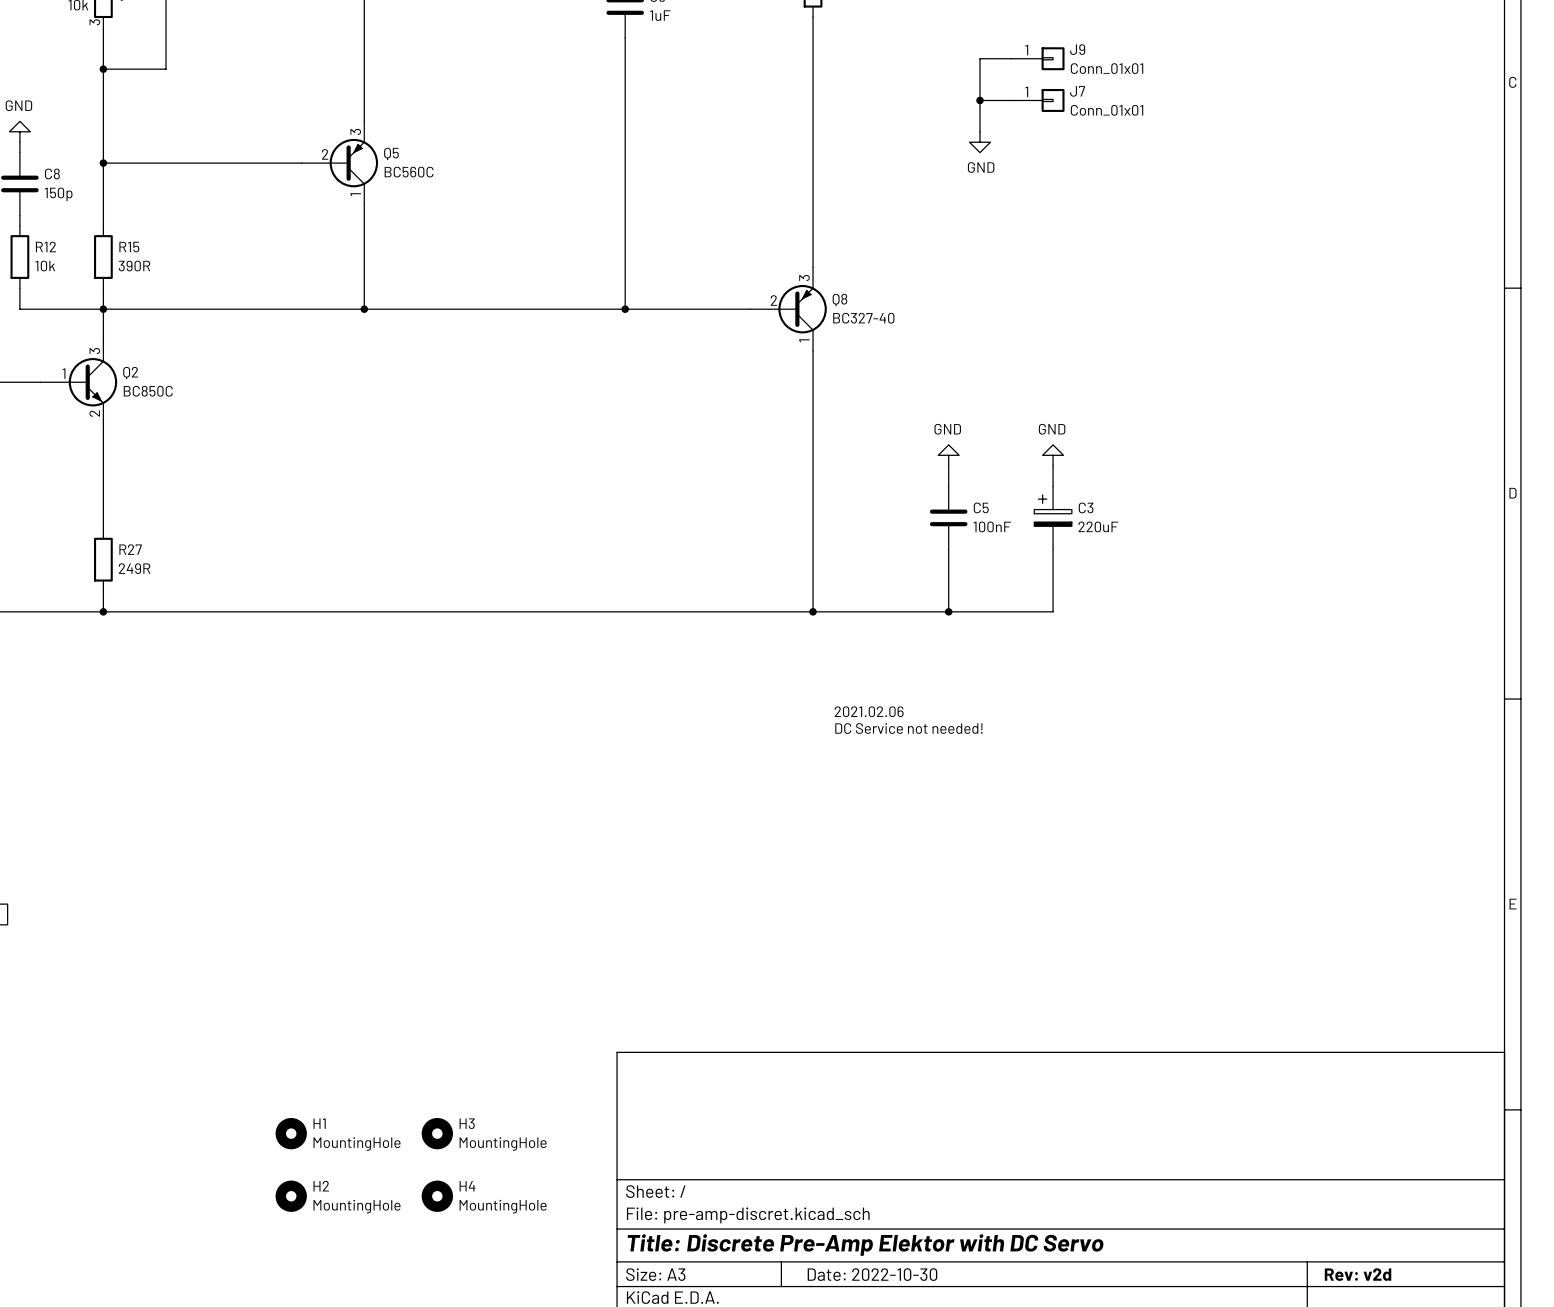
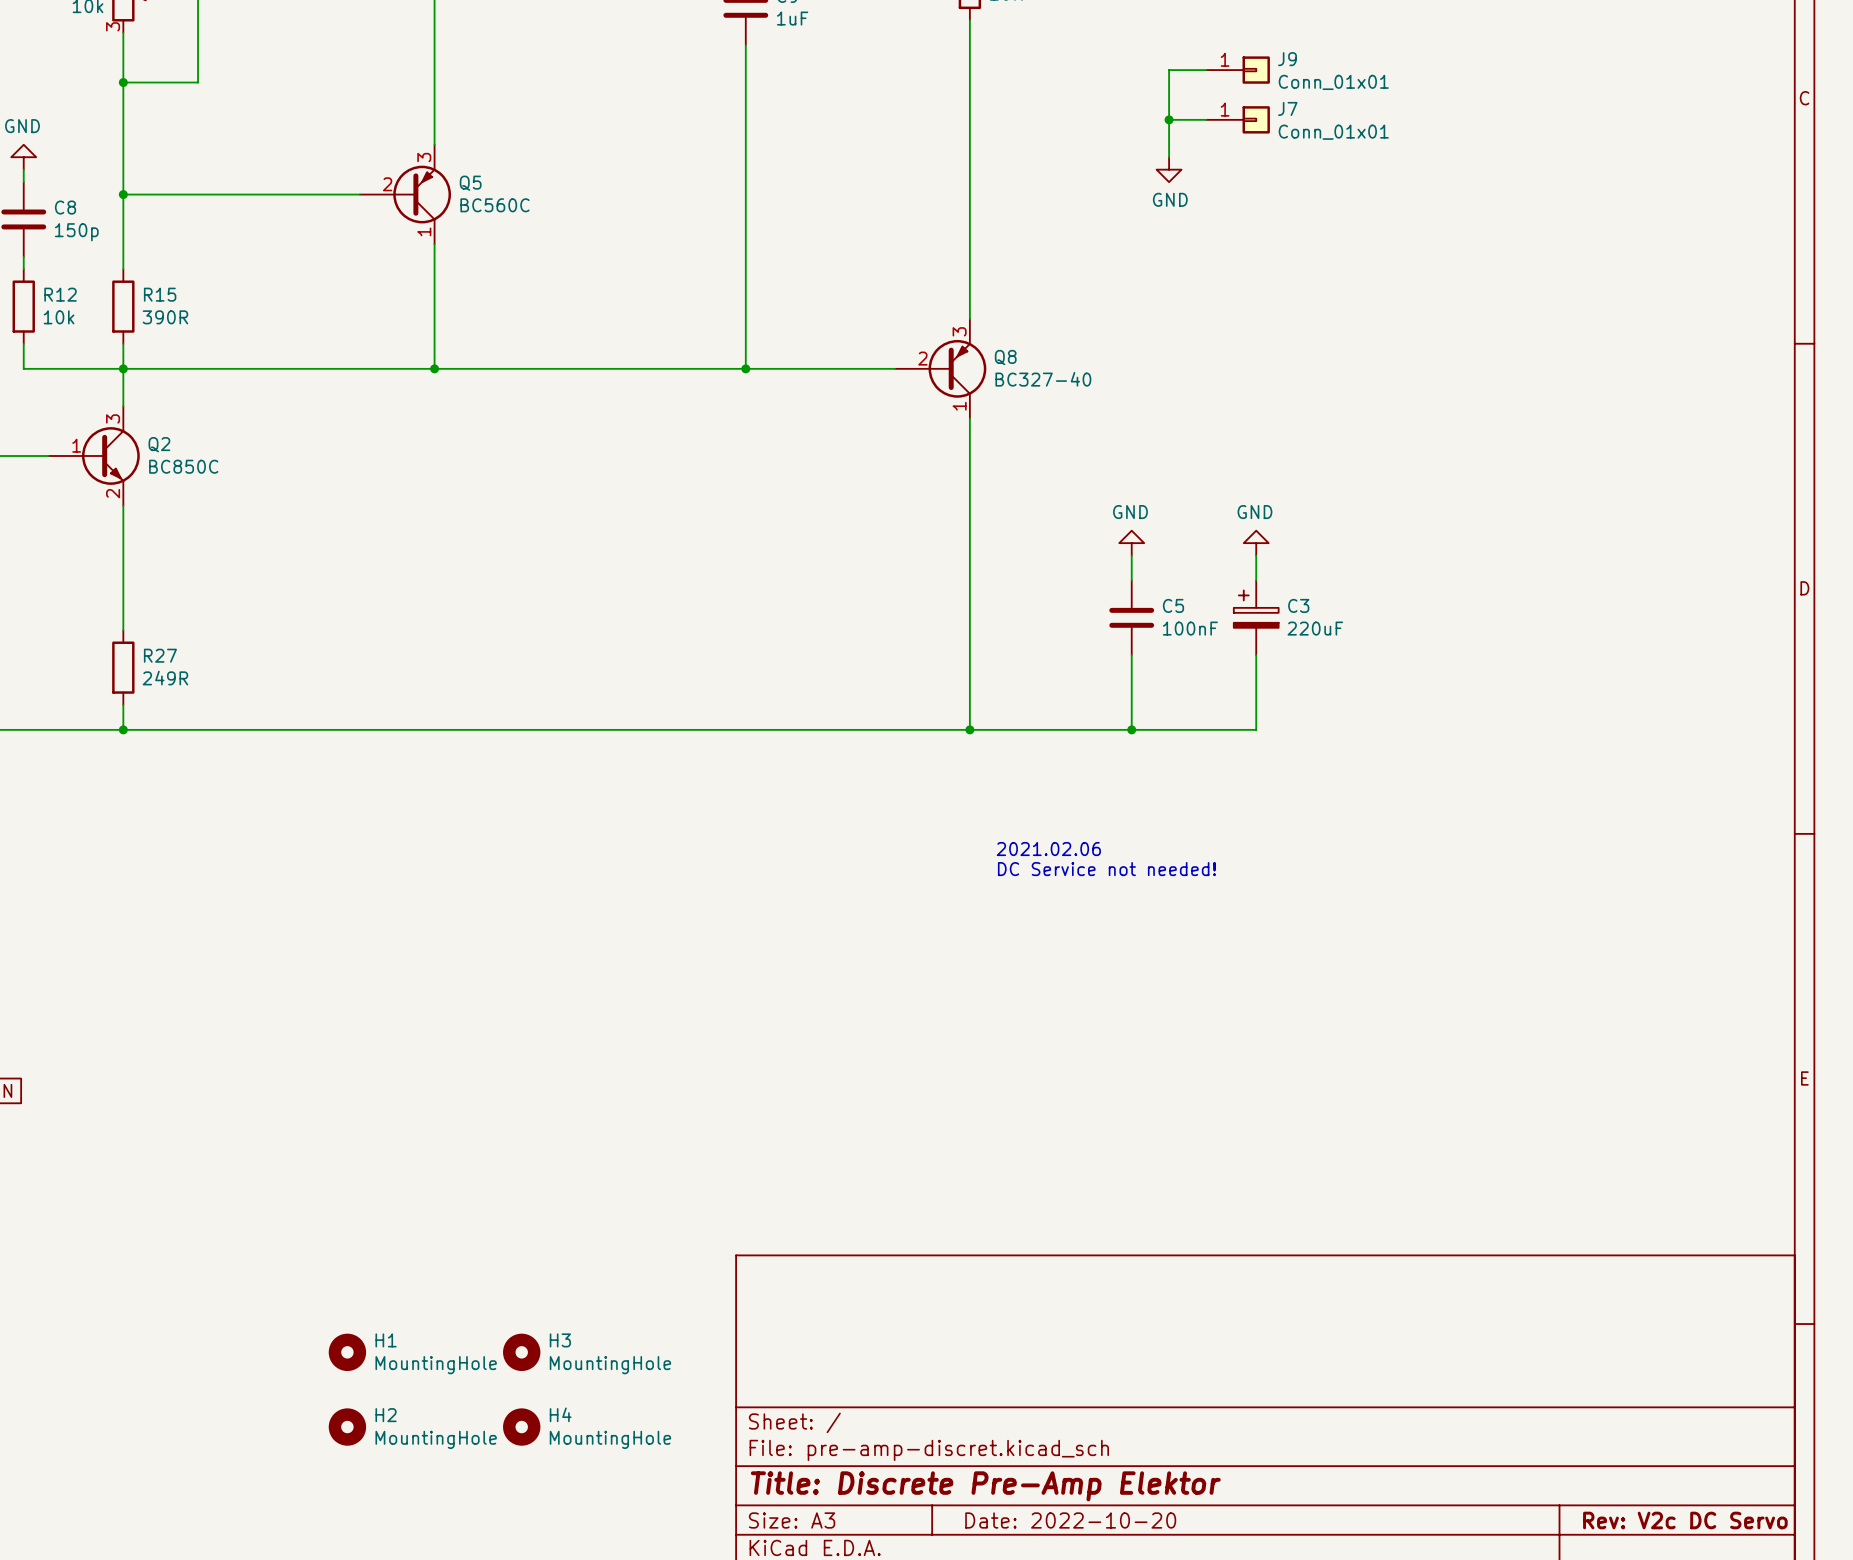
title block: Title: Discrete Pre-Amp Elektor with DC Servo (865, 1245) -> Title: Discrete Pre-Amp Elektor (985, 1486)
title block: Date: 2022-10-30 (872, 1274) -> Date: 2022-10-20 (1070, 1520)
title block: Rev: v2d (1358, 1274) -> Rev: V2c DC Servo (1685, 1520)

